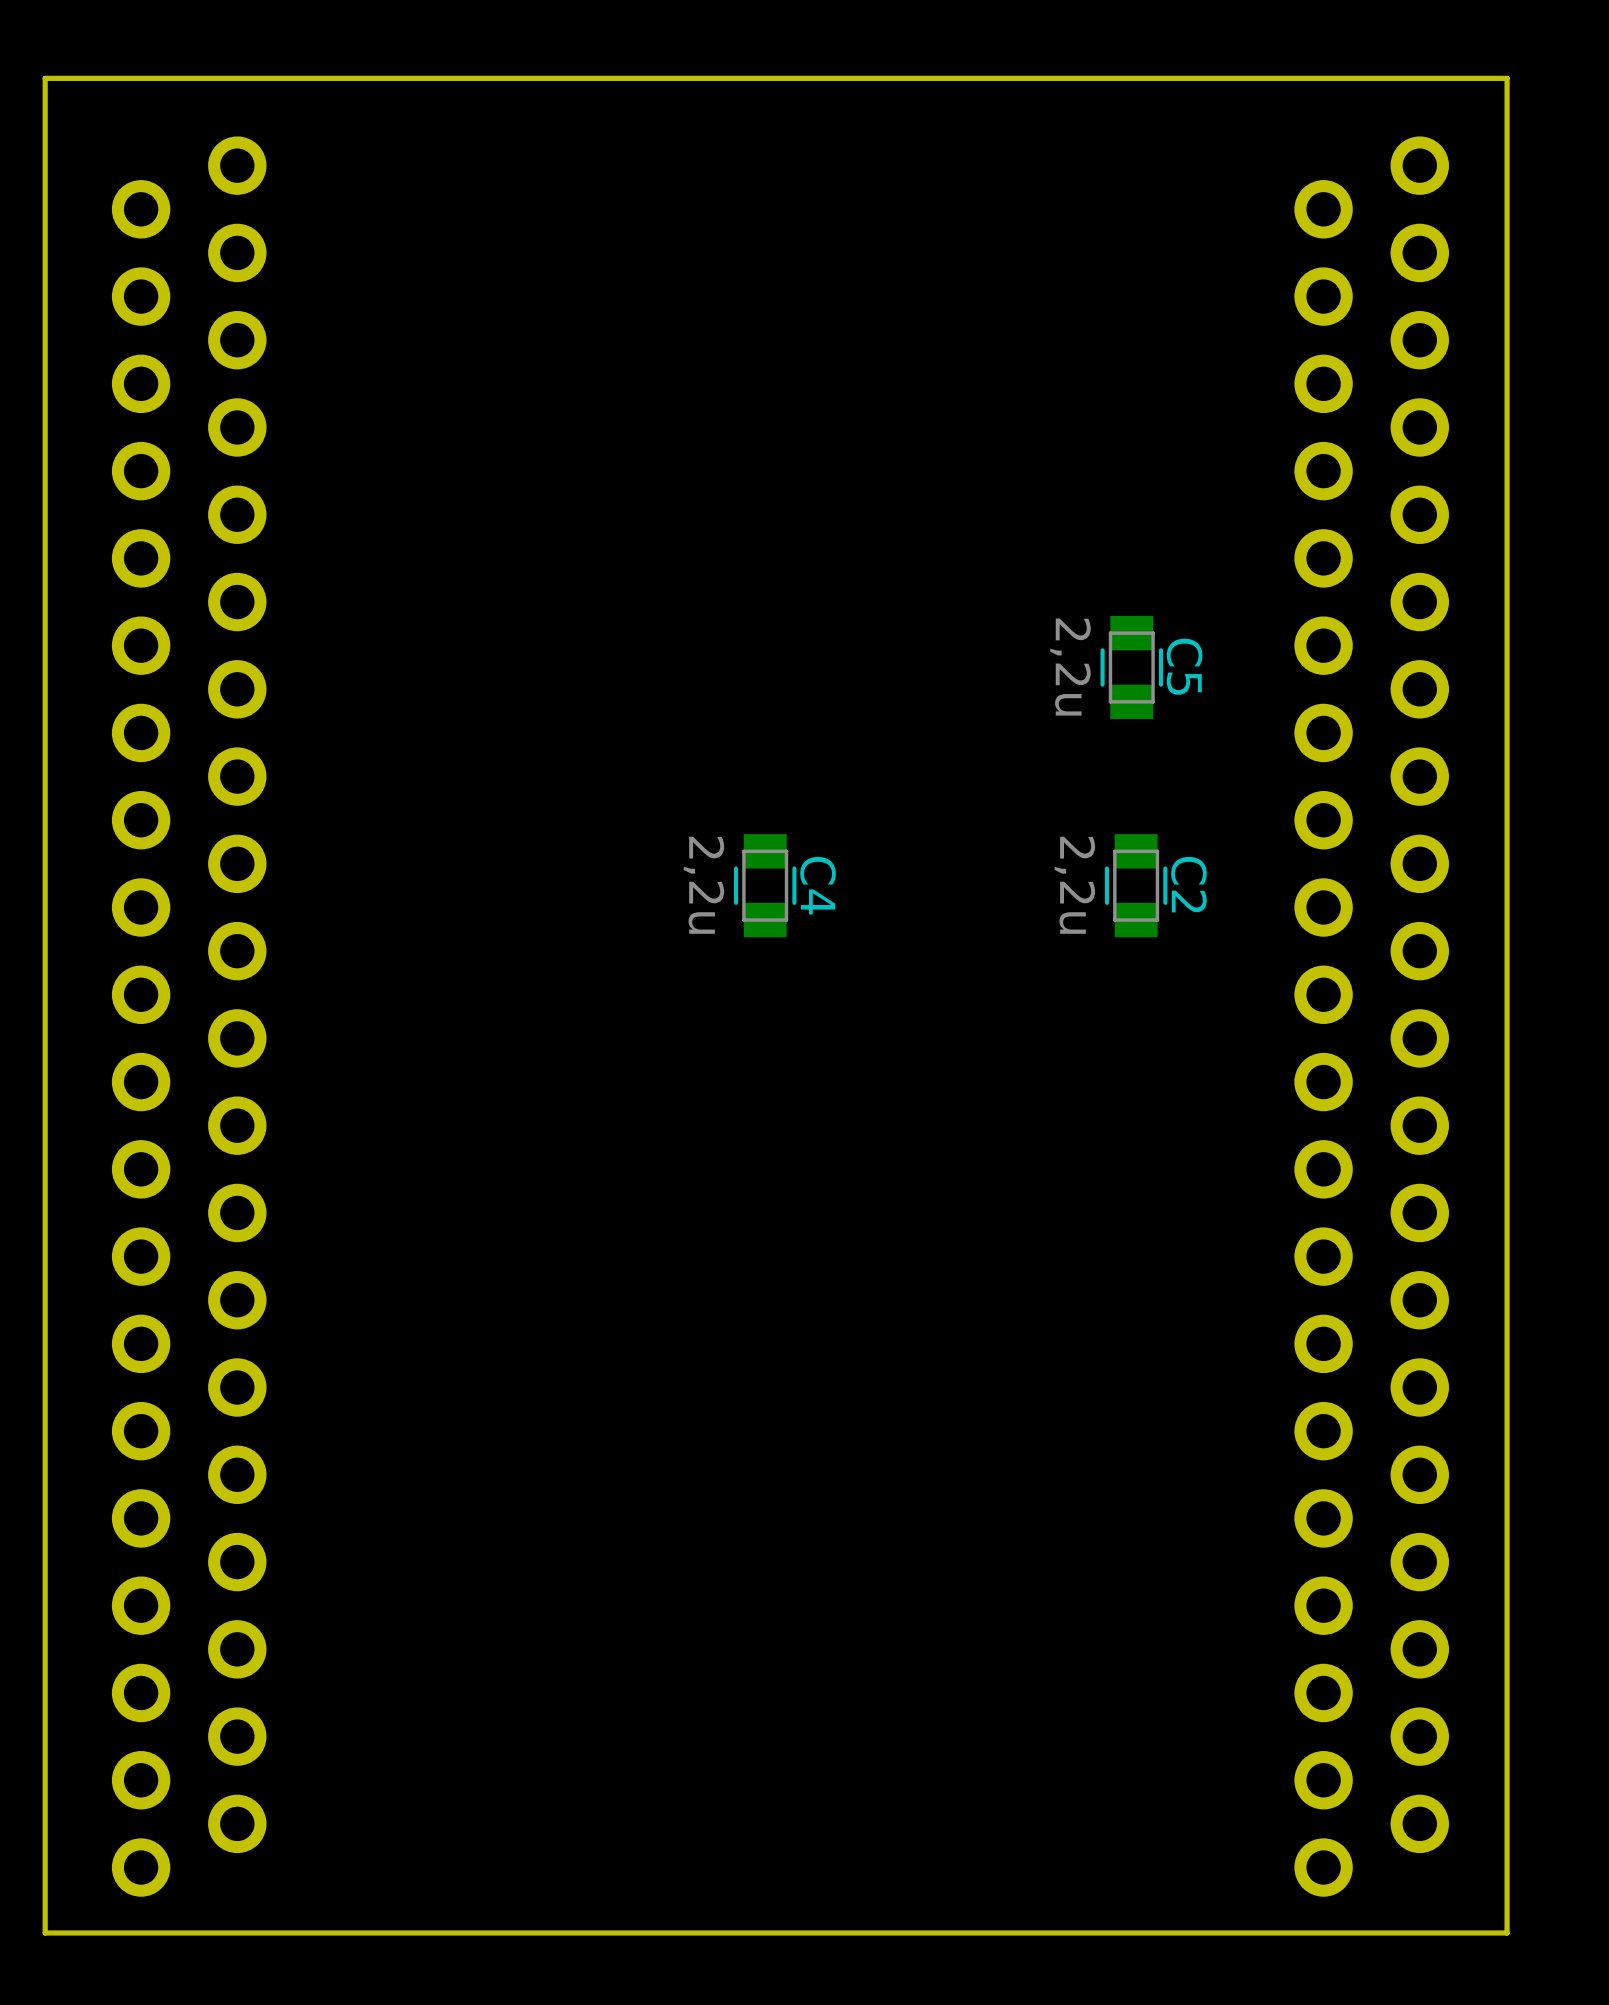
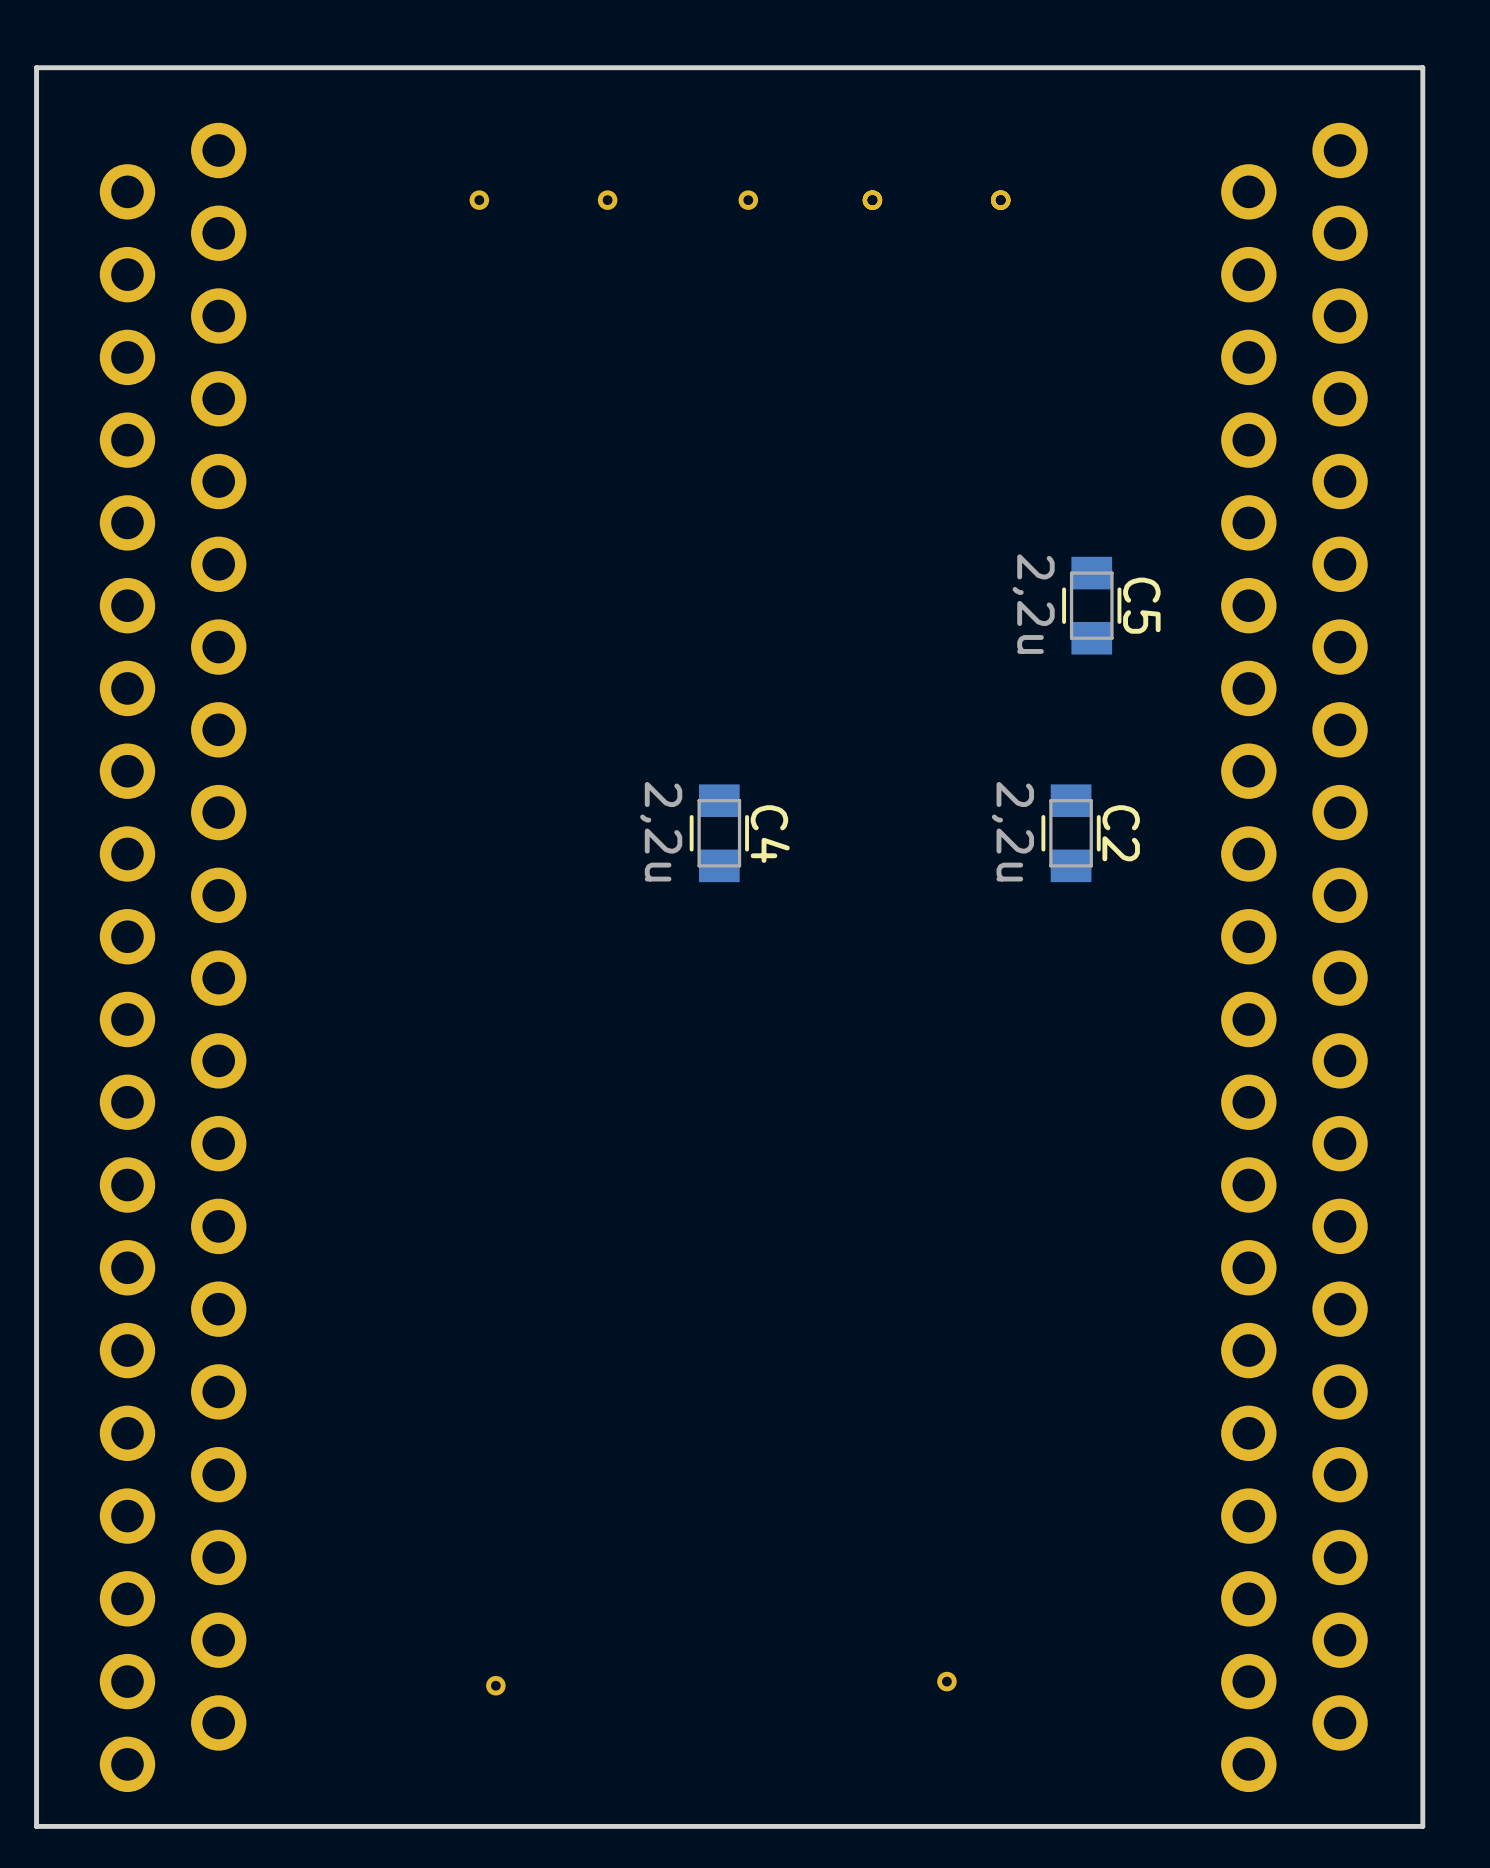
part: none -> (479, 200)
part: none -> (607, 200)
part: none -> (748, 200)
part: none -> (872, 200)
part: none -> (1000, 200)
C5 position: (1131, 667) -> (1091, 605)
part: none -> (946, 1681)
part: none -> (495, 1685)

